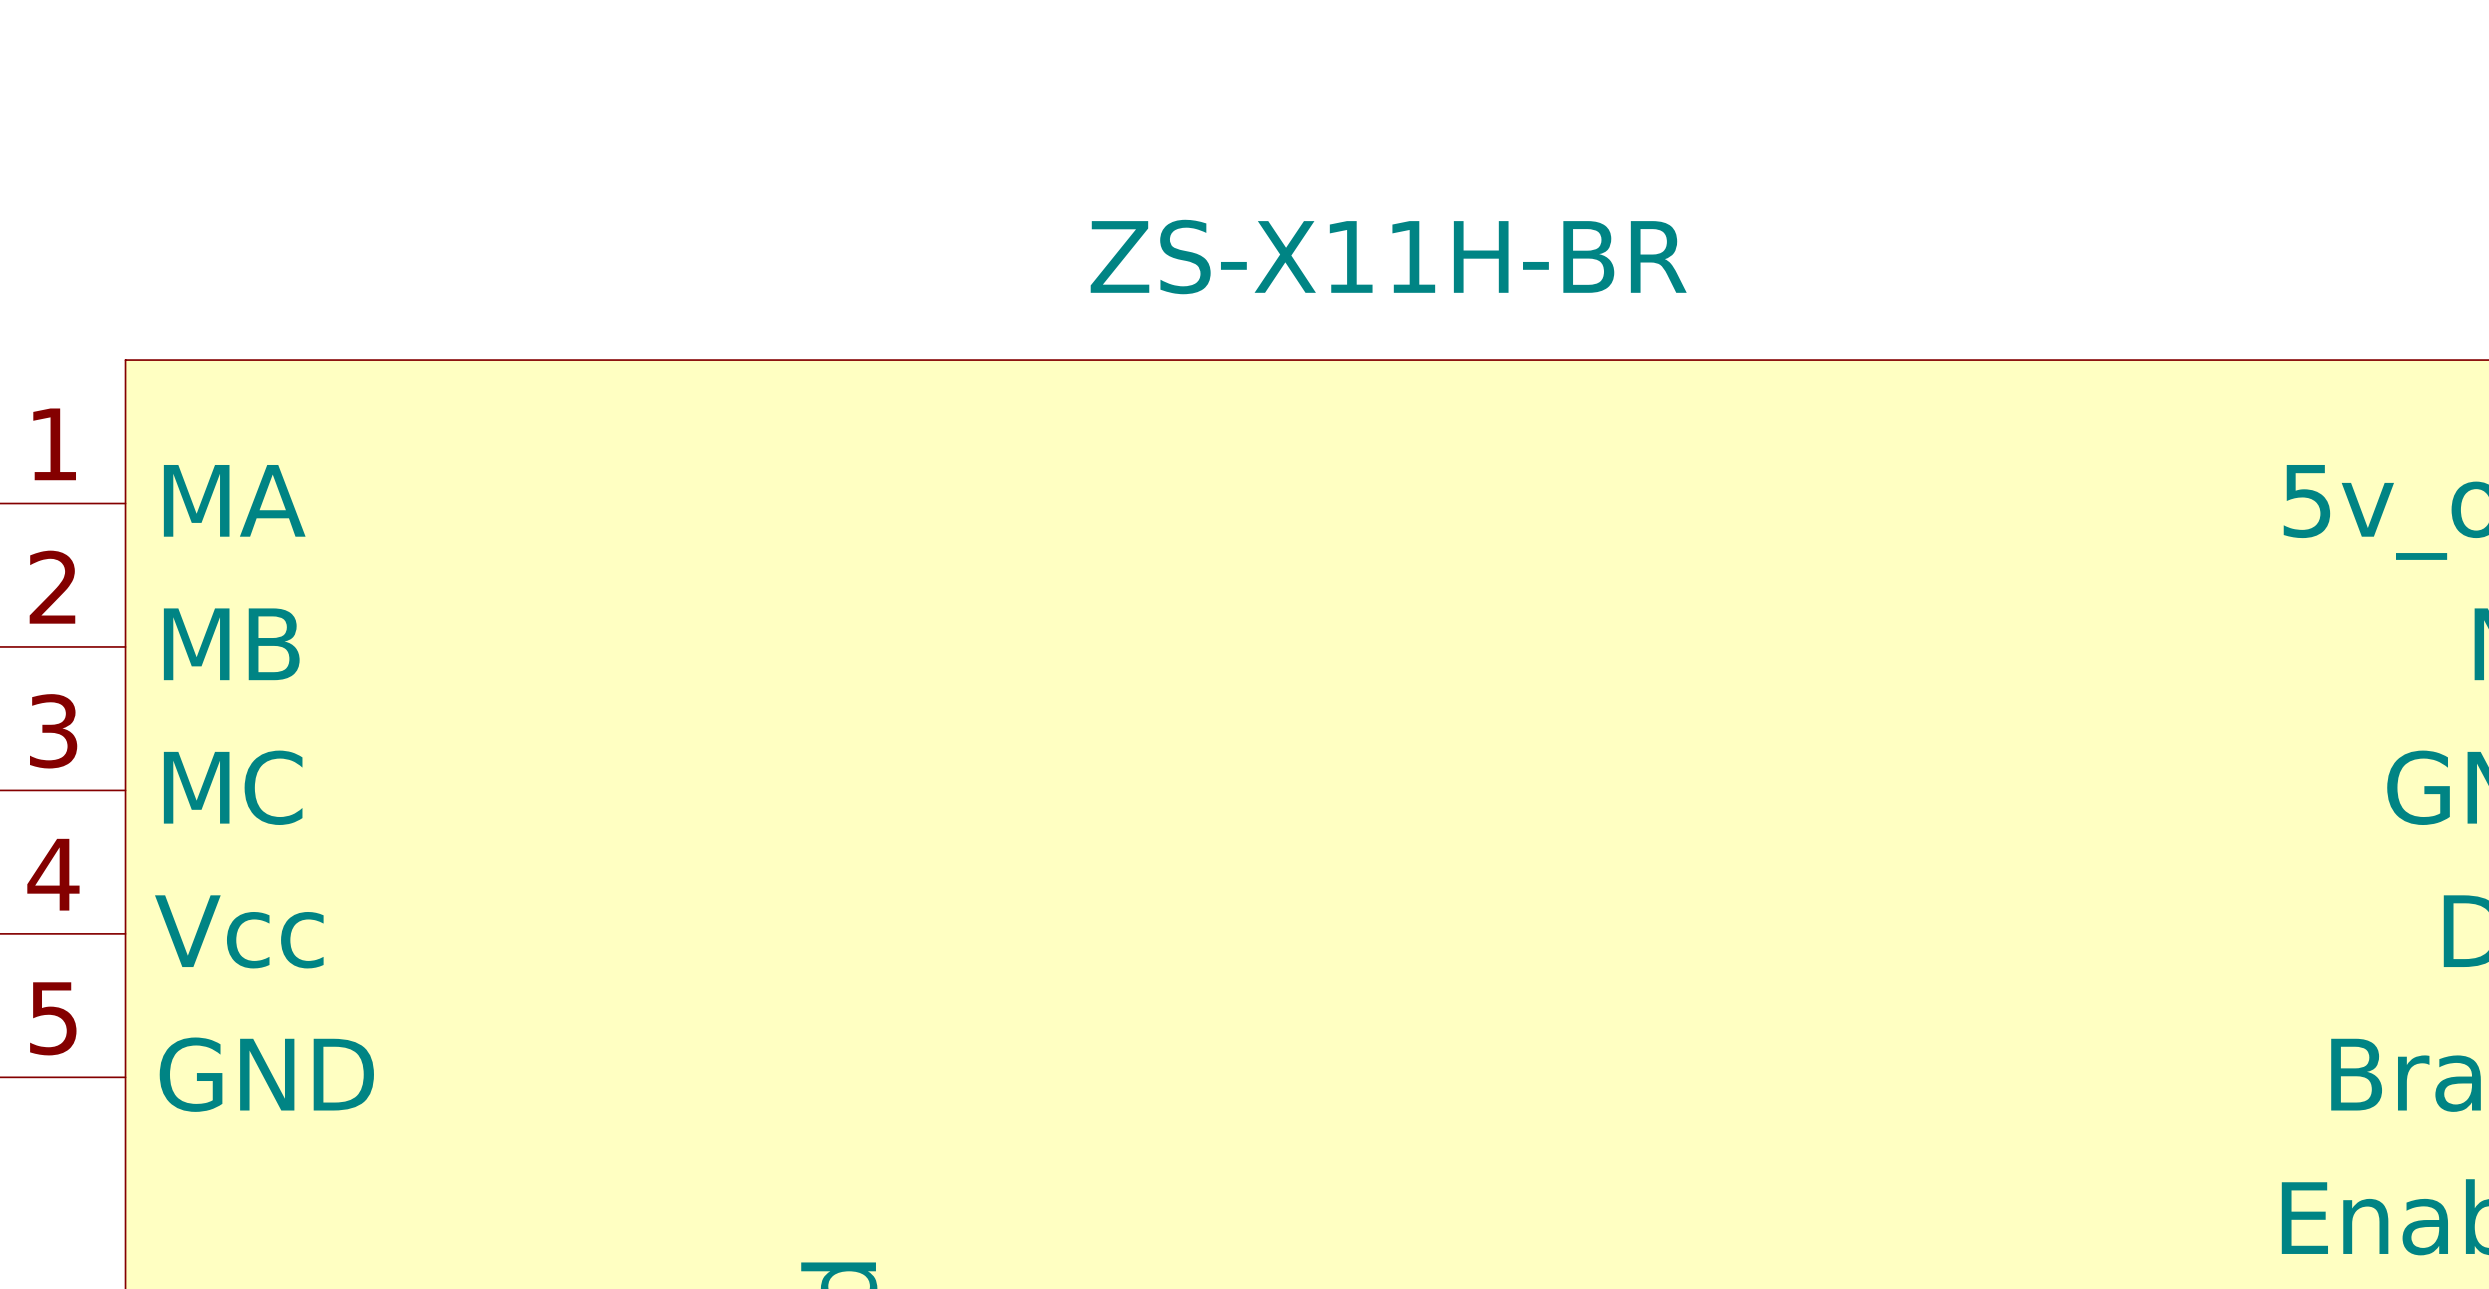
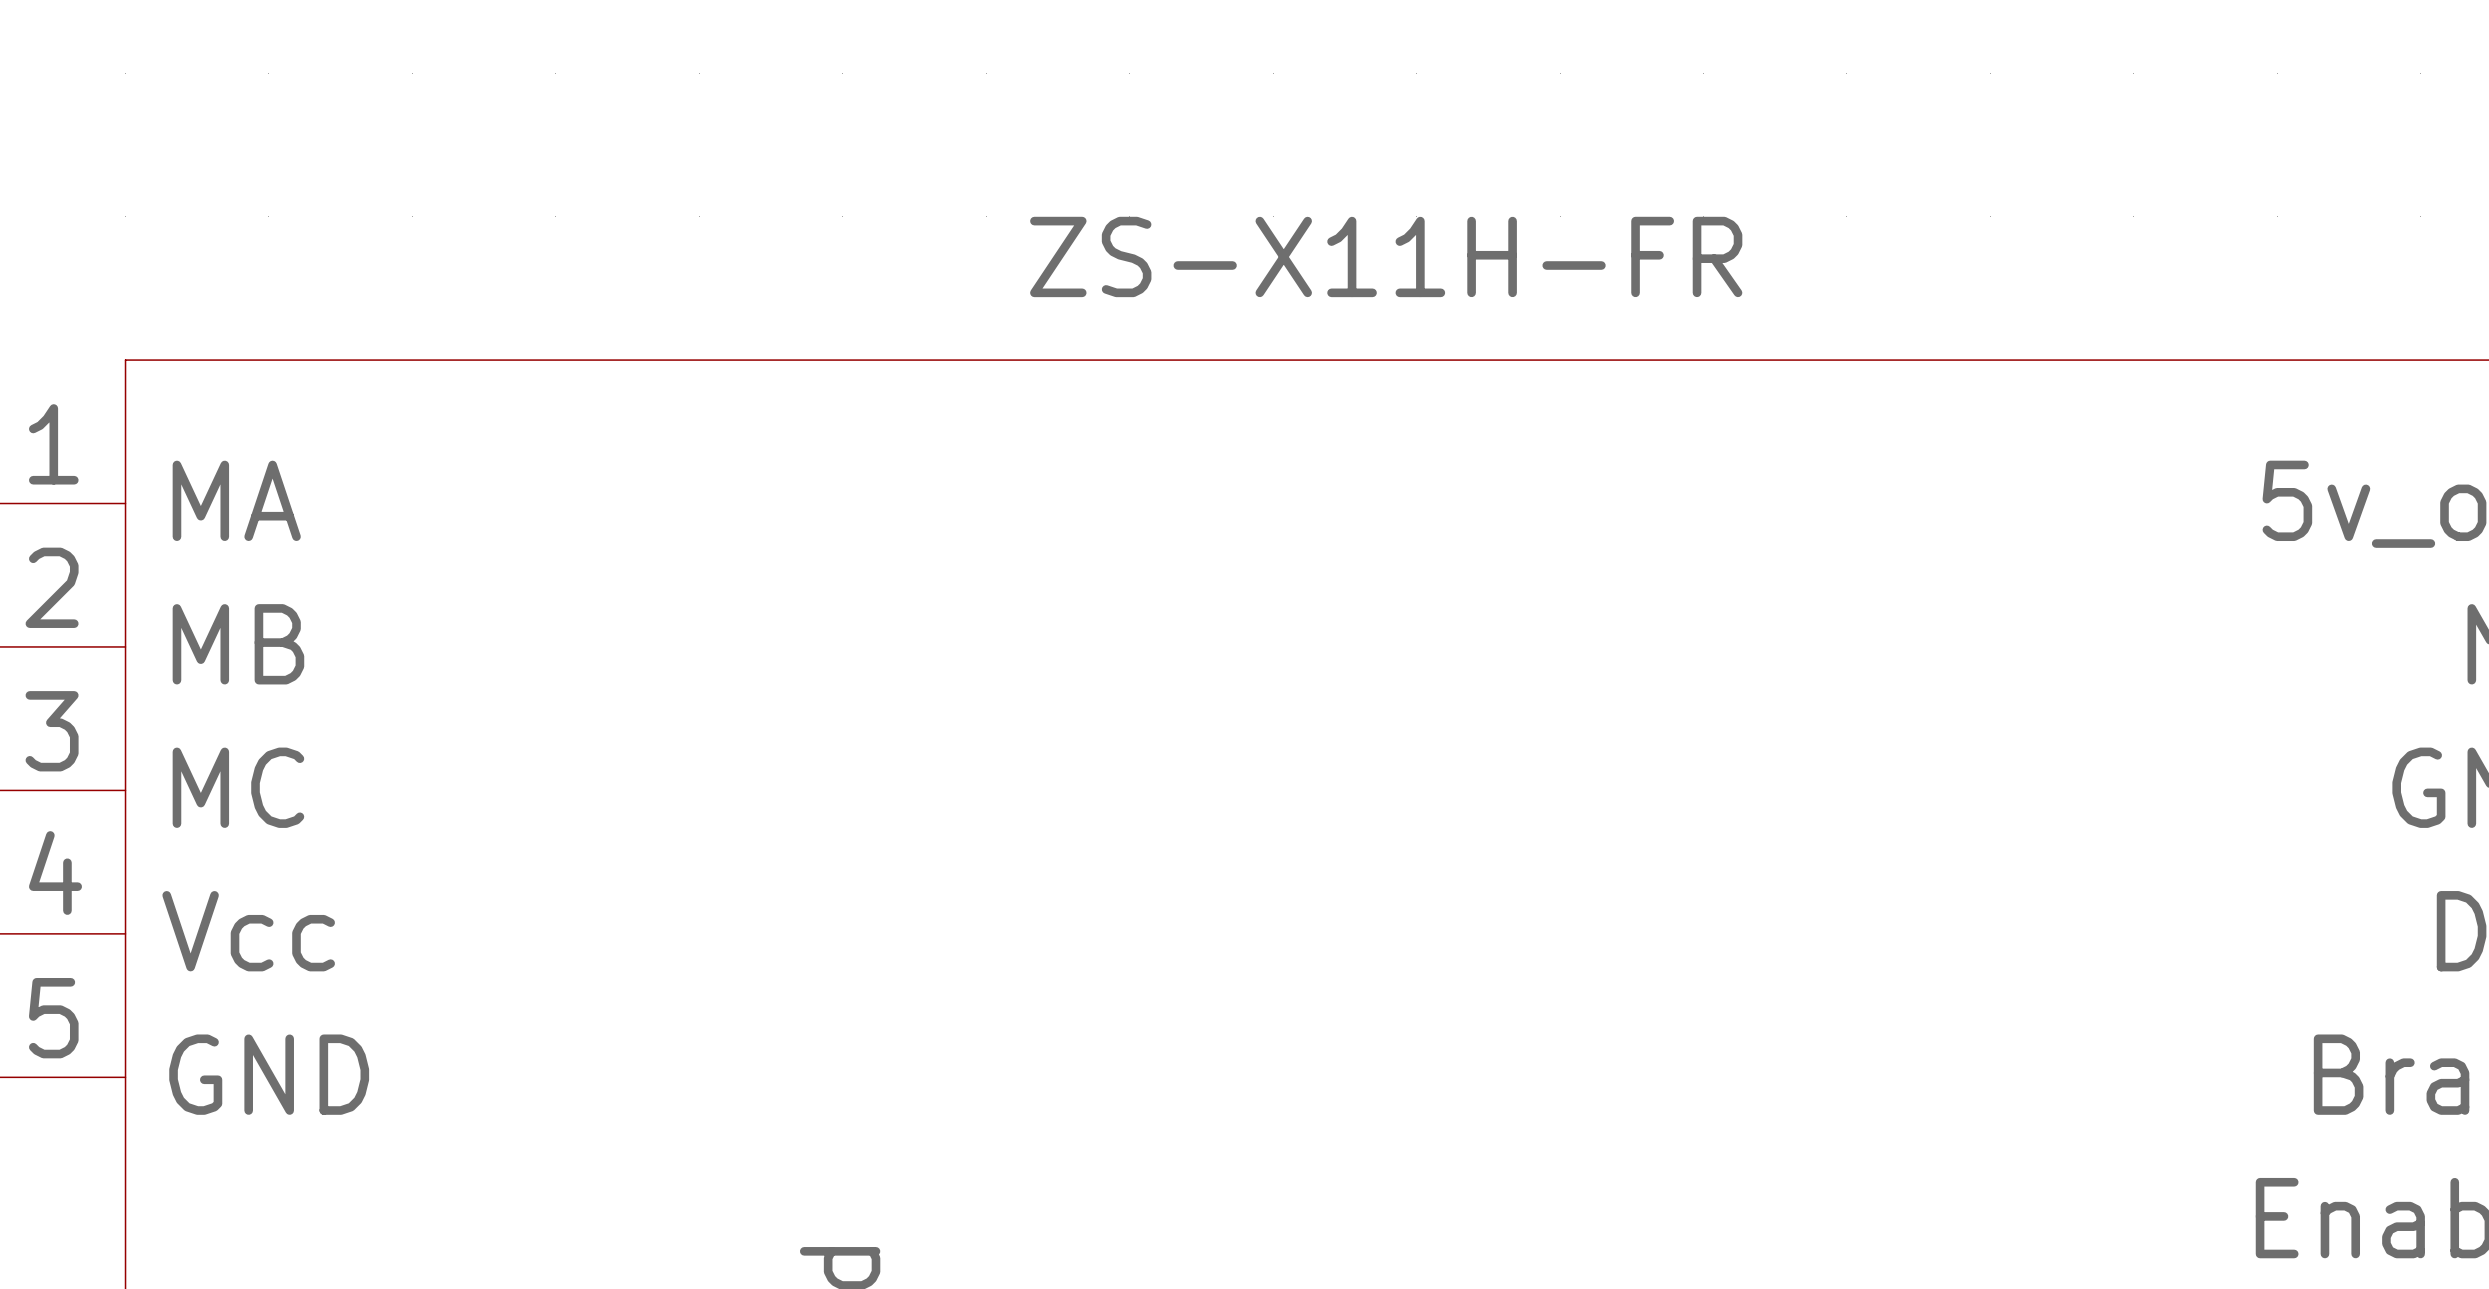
ZS-X11H-BR name: ZS-X11H-BR (1388, 257) -> ZS-X11H-FR (1386, 256)

